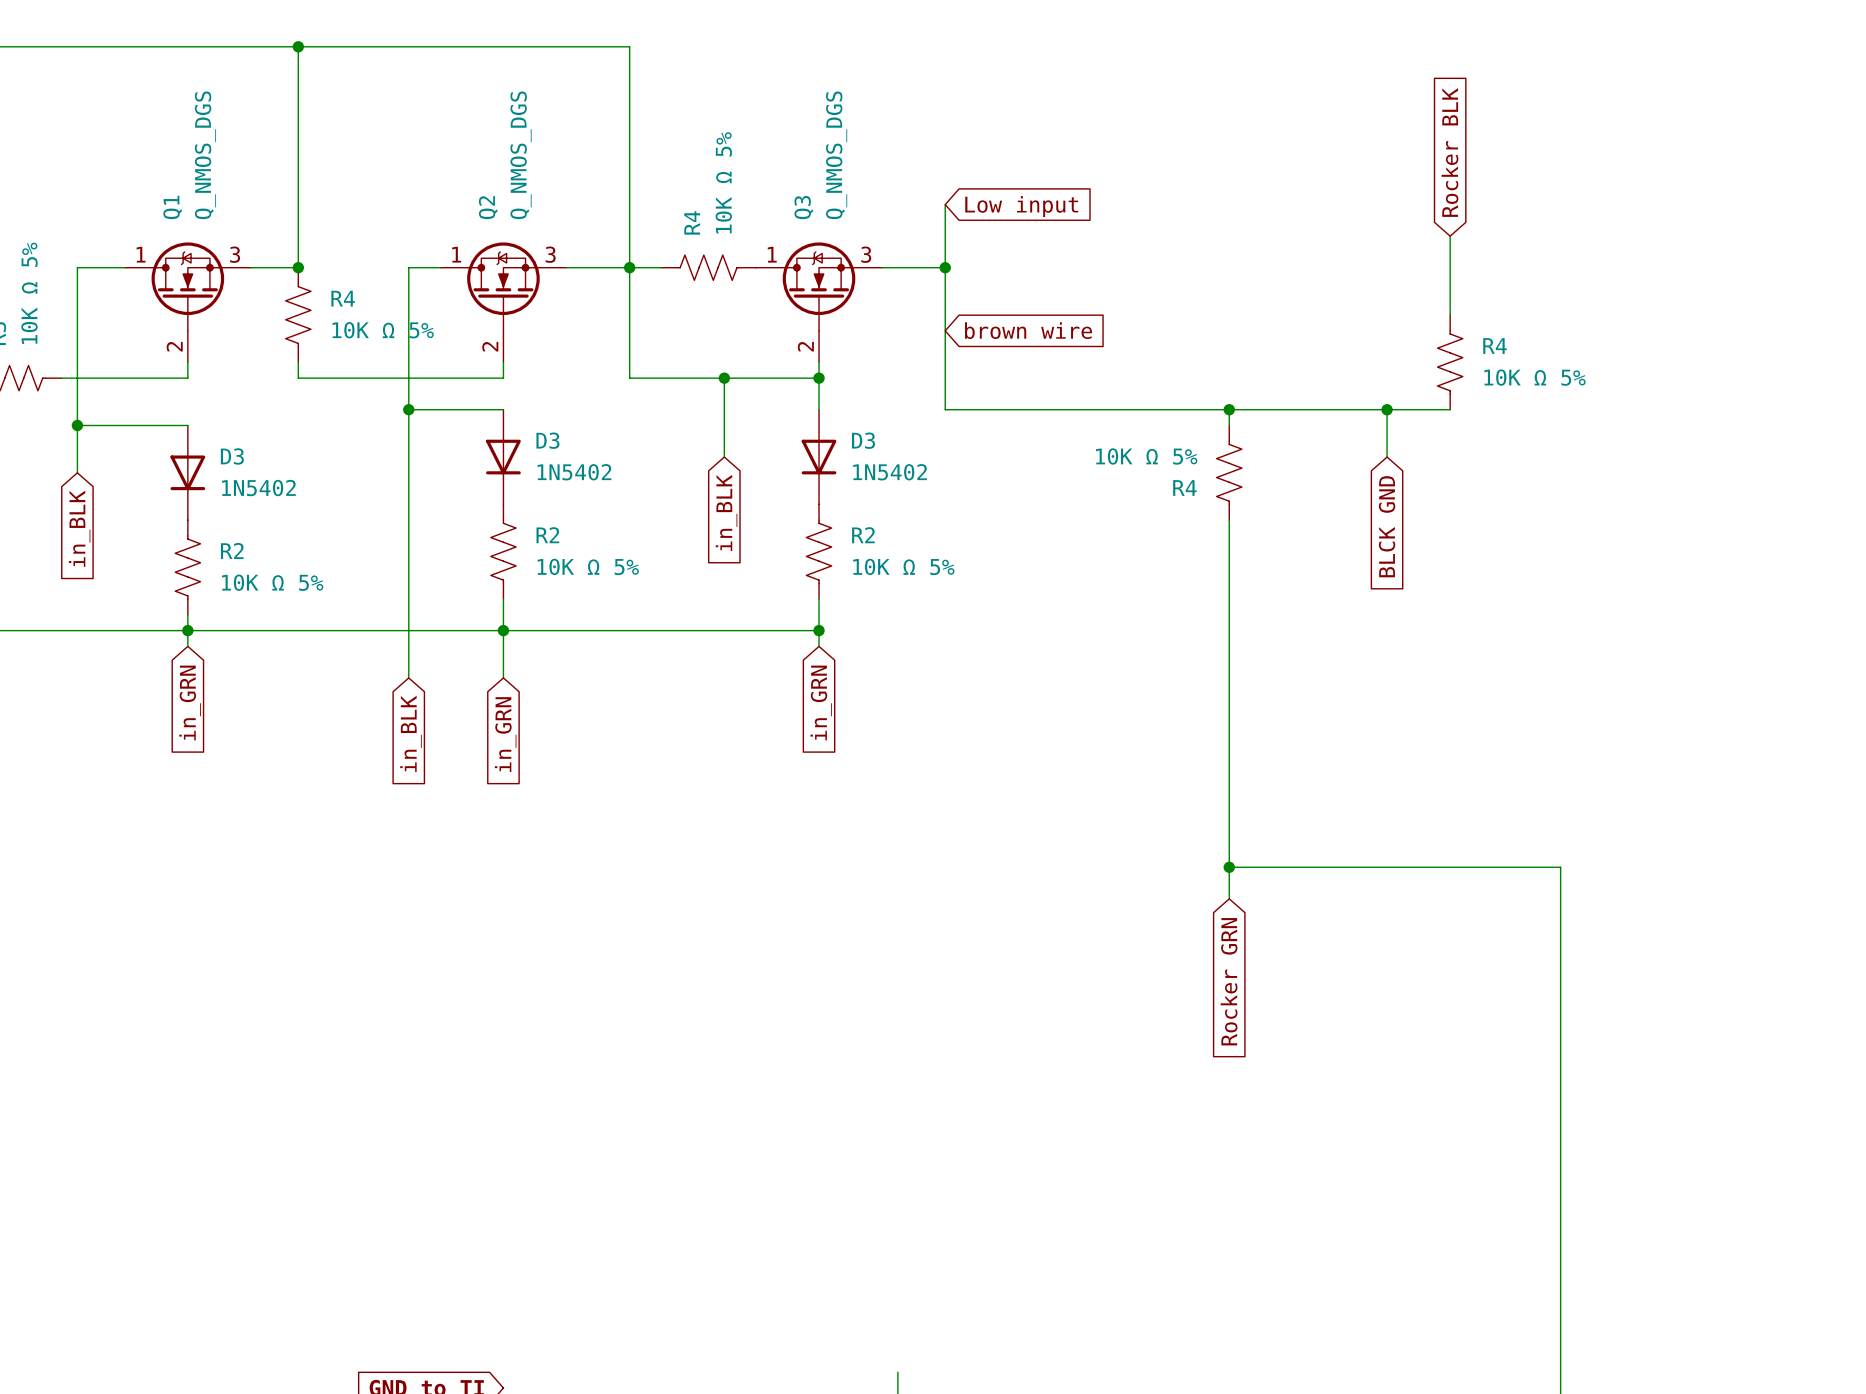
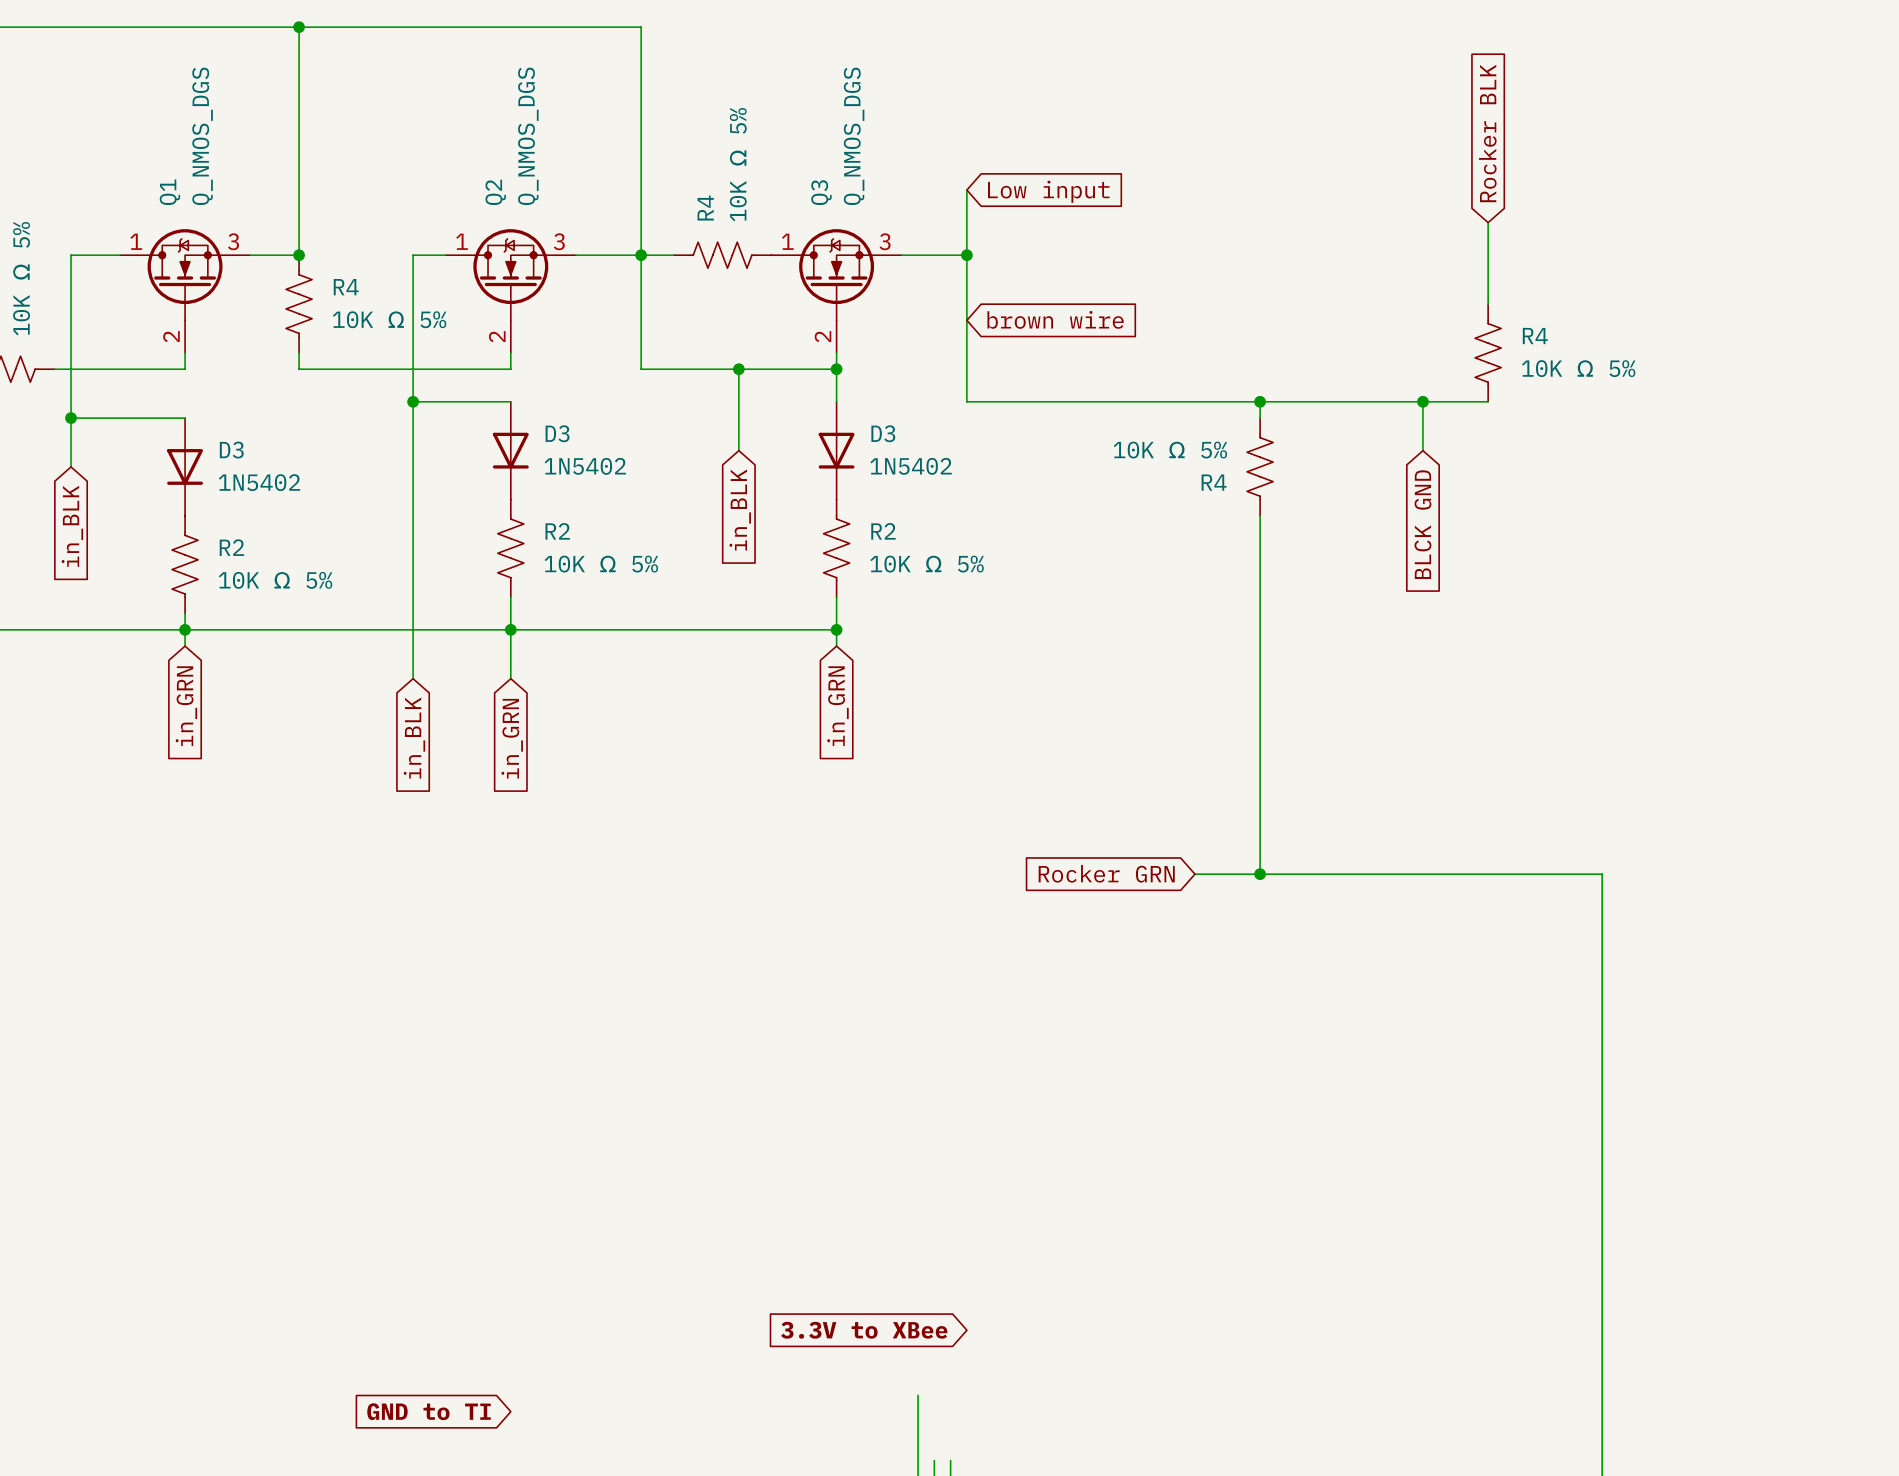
wire: (1229, 867) (1229, 898) -> (1260, 874) (1194, 874)
global label rotation: 0° (1229, 981) -> 90° clockwise (1106, 873)
global label position: Rocker GRN (1229, 981) -> Rocker GRN (1106, 873)
global label: none -> 3.3V to XBee (864, 1330)

